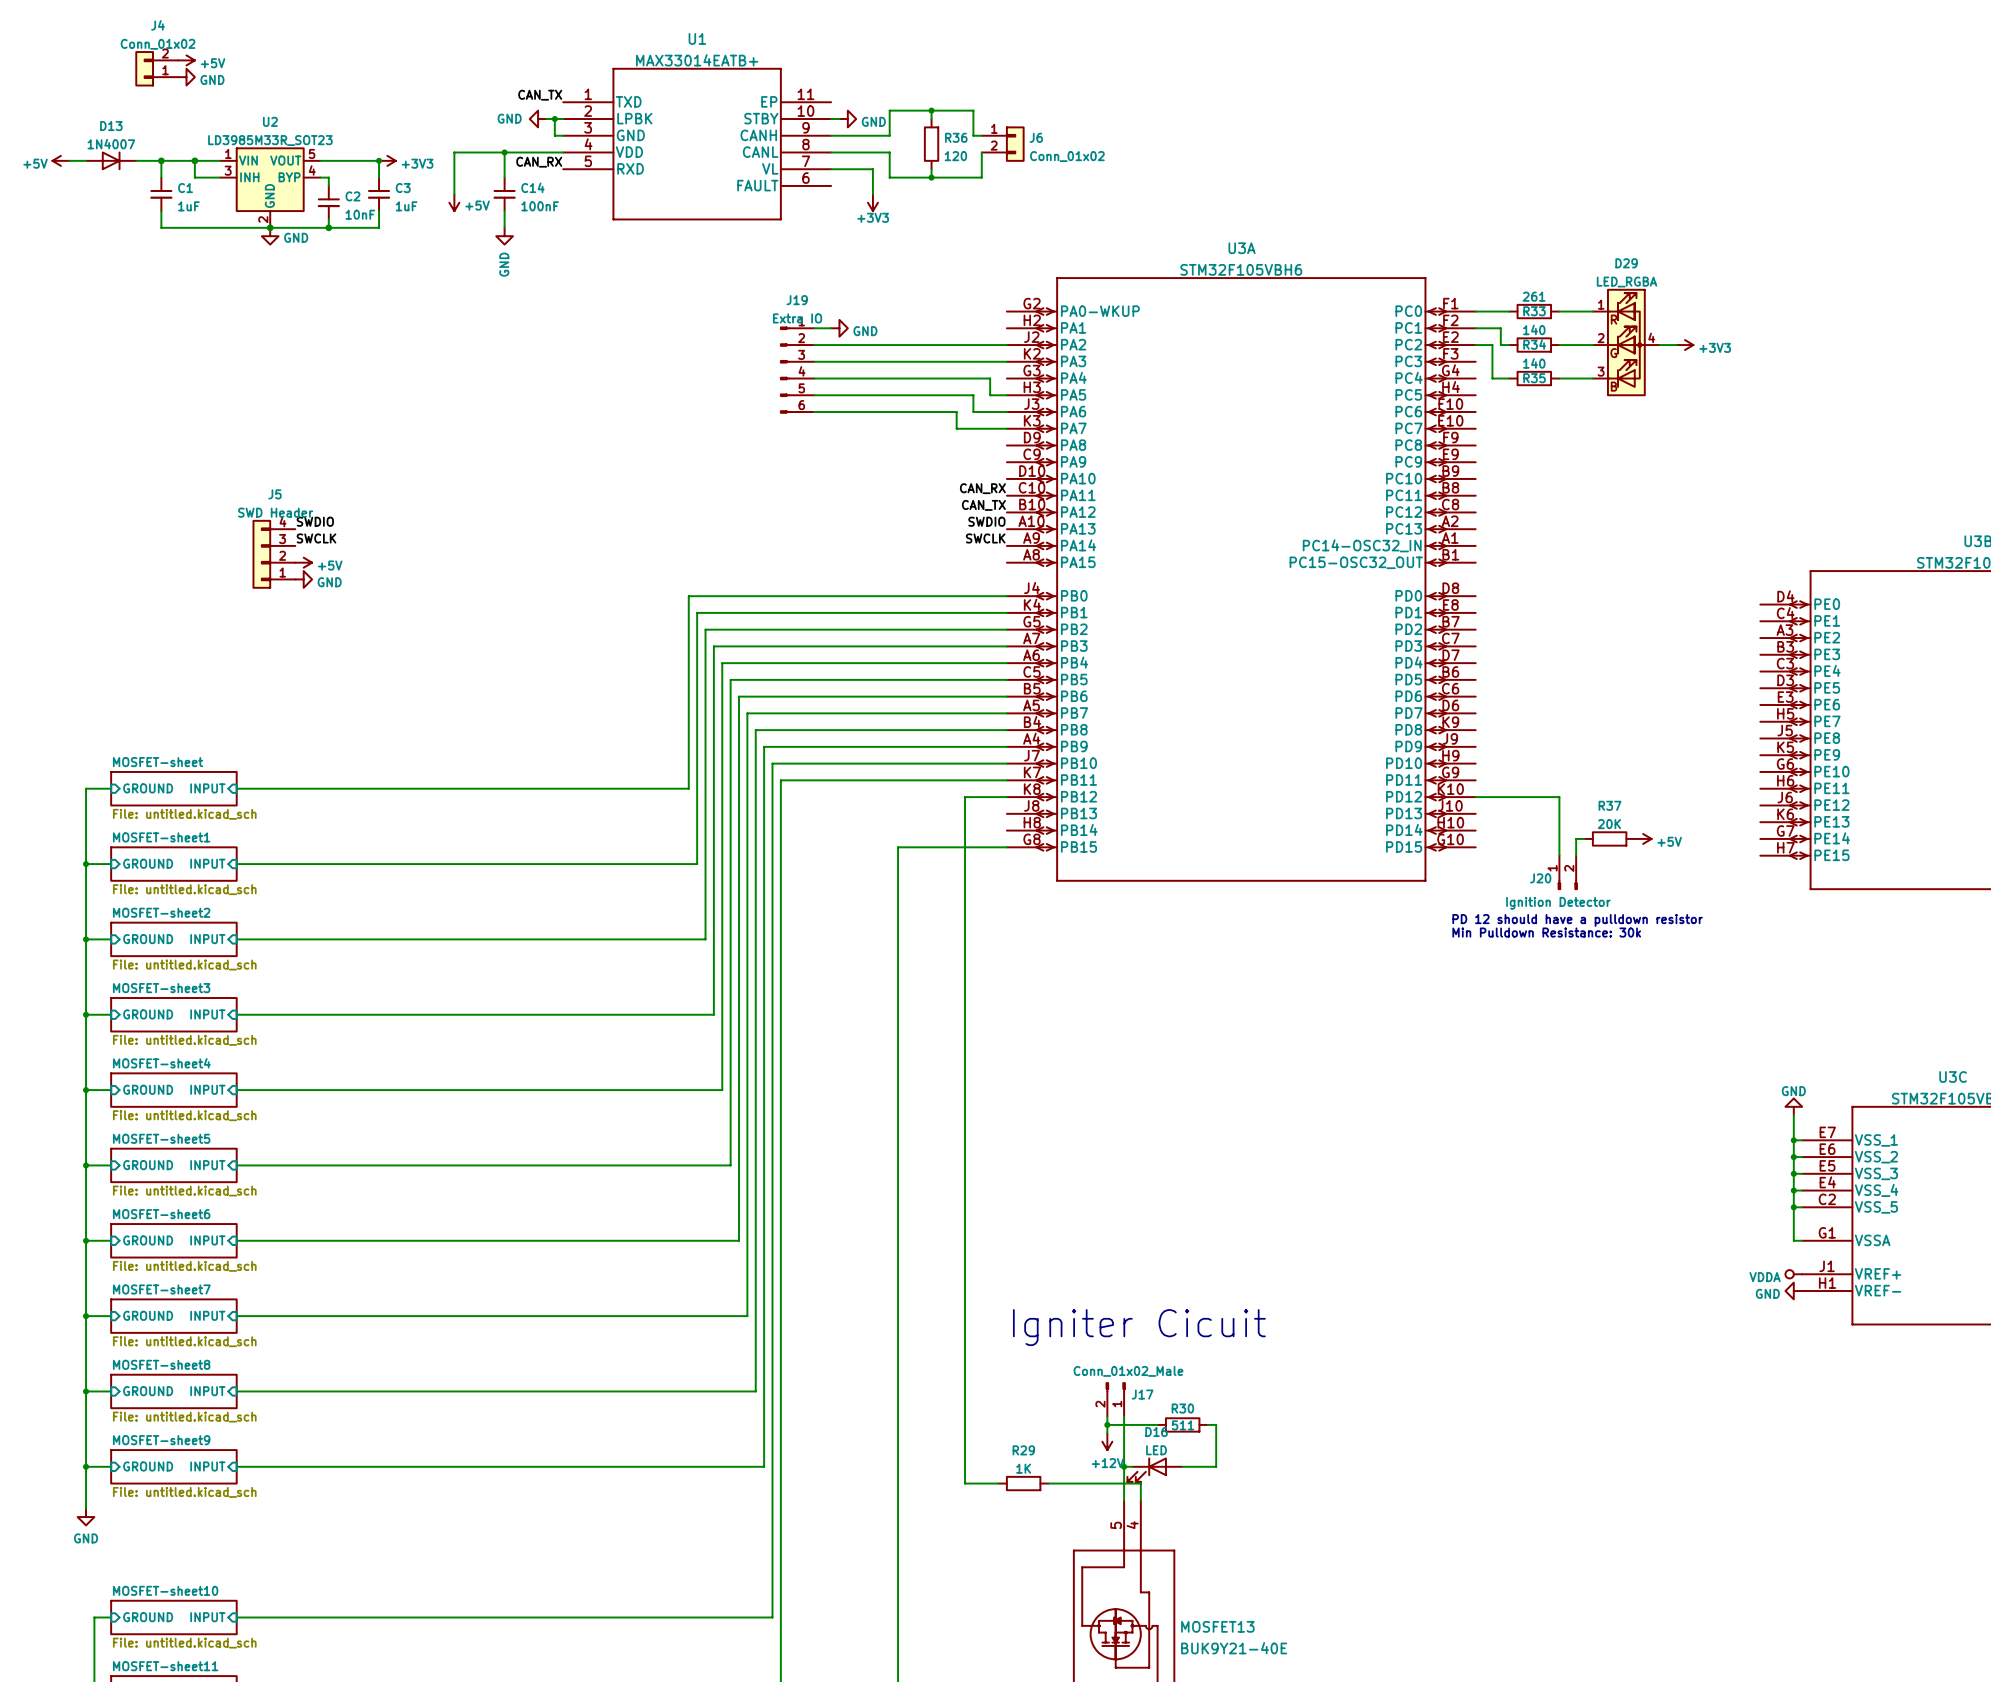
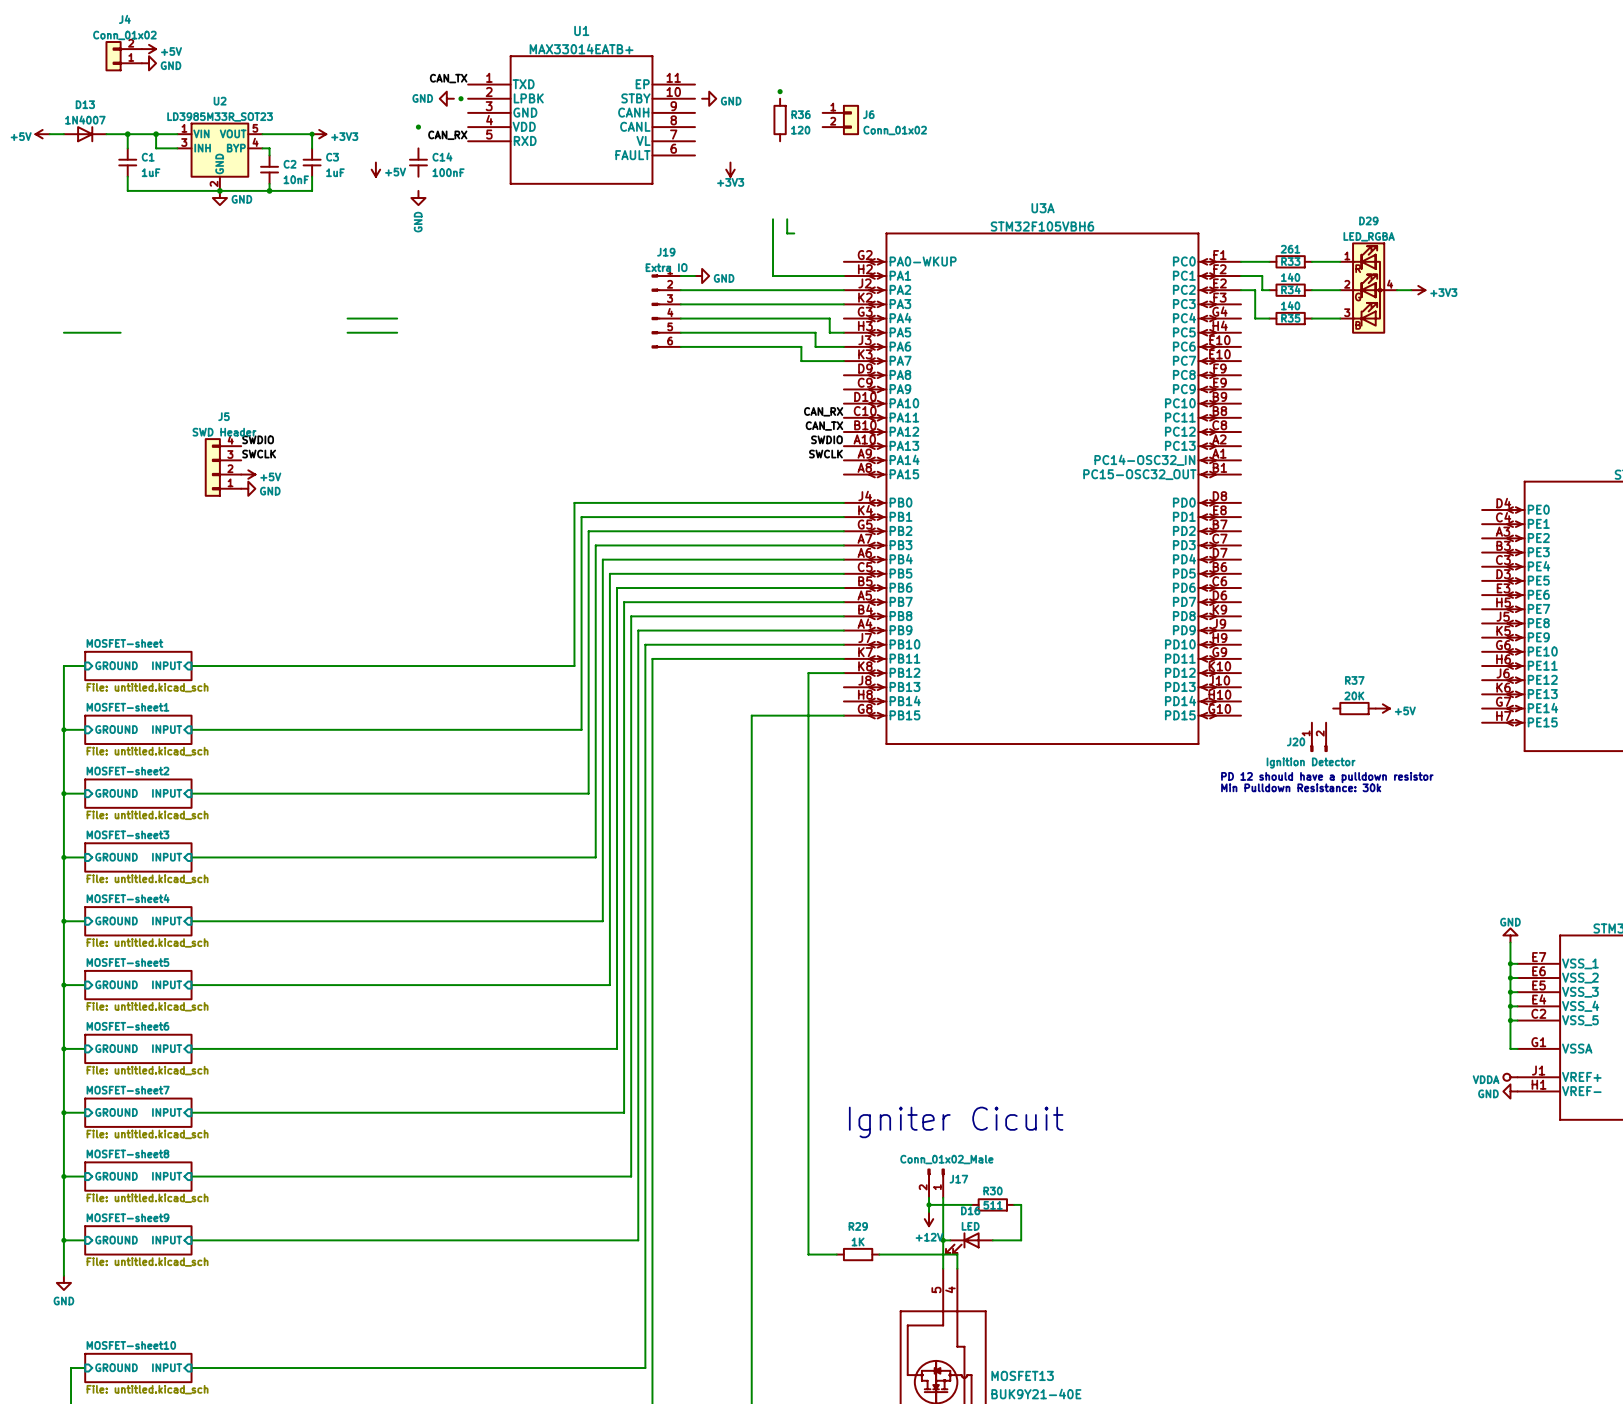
wire: (931, 110) (931, 119) -> none
wire: (546, 119) (563, 119) -> none
wire: (554, 119) (554, 135) (563, 135) -> none
wire: (831, 119) (839, 119) -> none
wire: (831, 135) (889, 135) (889, 110) (973, 110) (973, 135) (981, 135) -> none
wire: (504, 152) (504, 177) -> none
wire: (563, 152) (454, 152) (454, 194) -> none
wire: (831, 152) (889, 152) (889, 177) (981, 177) (981, 152) -> none
wire: (831, 169) (872, 169) (872, 194) -> none
wire: (931, 169) (931, 177) -> none
junction: (931, 177) -> none
wire: (504, 211) (504, 227) -> none
wire: none -> (773, 219) (773, 276) (843, 276)
wire: none -> (787, 219) (787, 233) (794, 233)
wire: none -> (347, 318) (397, 318)
wire: none -> (63, 332) (120, 332)
wire: none -> (347, 332) (397, 332)
wire: (1475, 797) (1559, 797) (1559, 855) -> none
wire: (1584, 838) (1576, 838) (1576, 855) -> none

